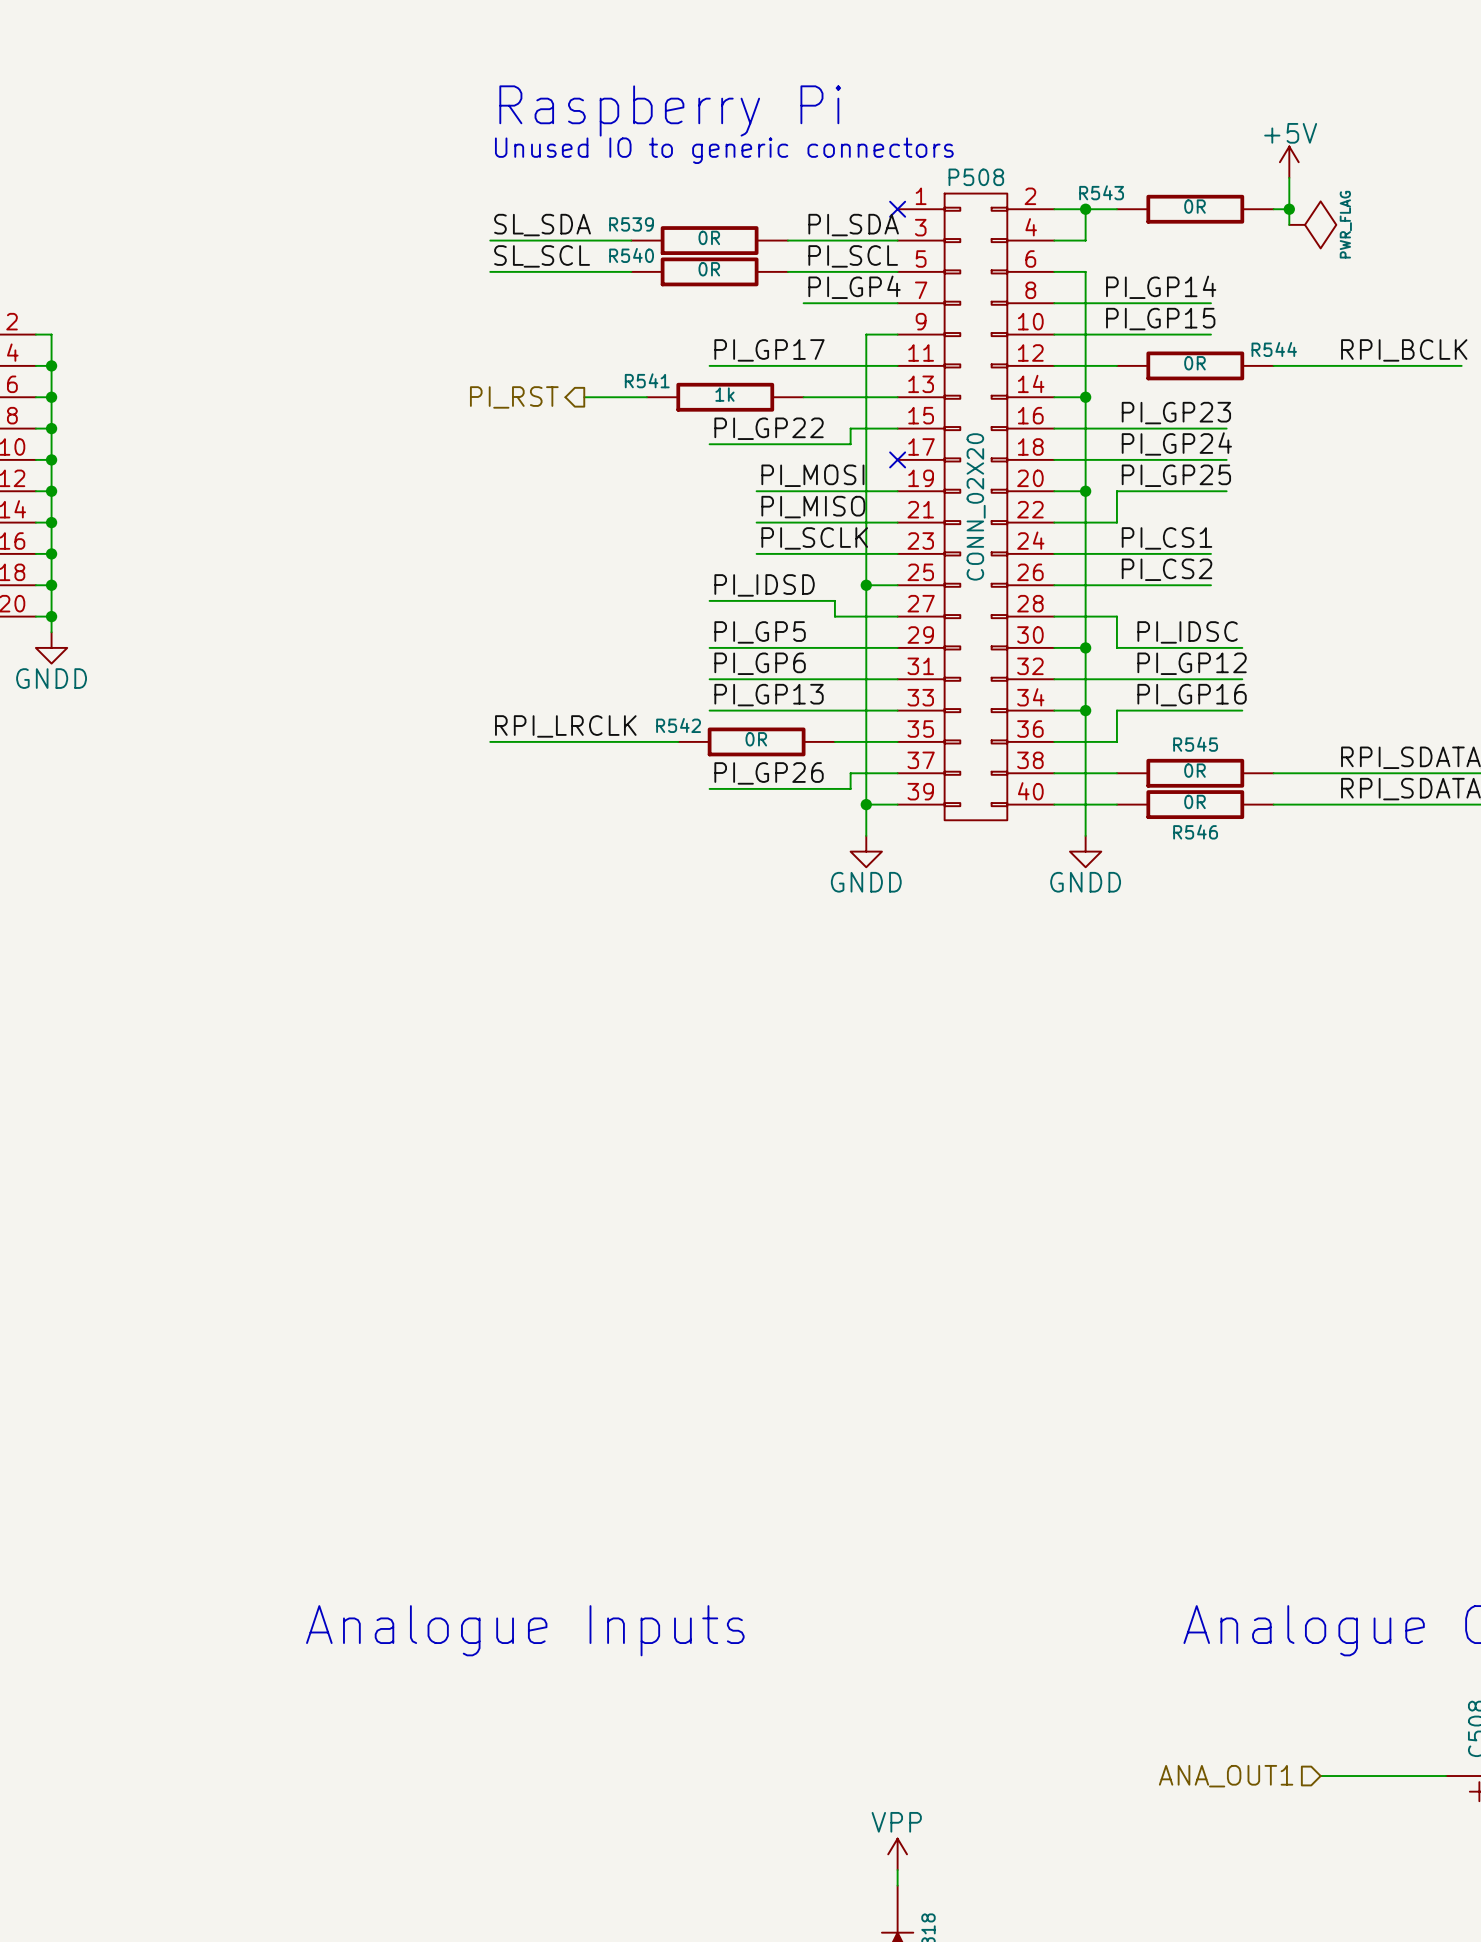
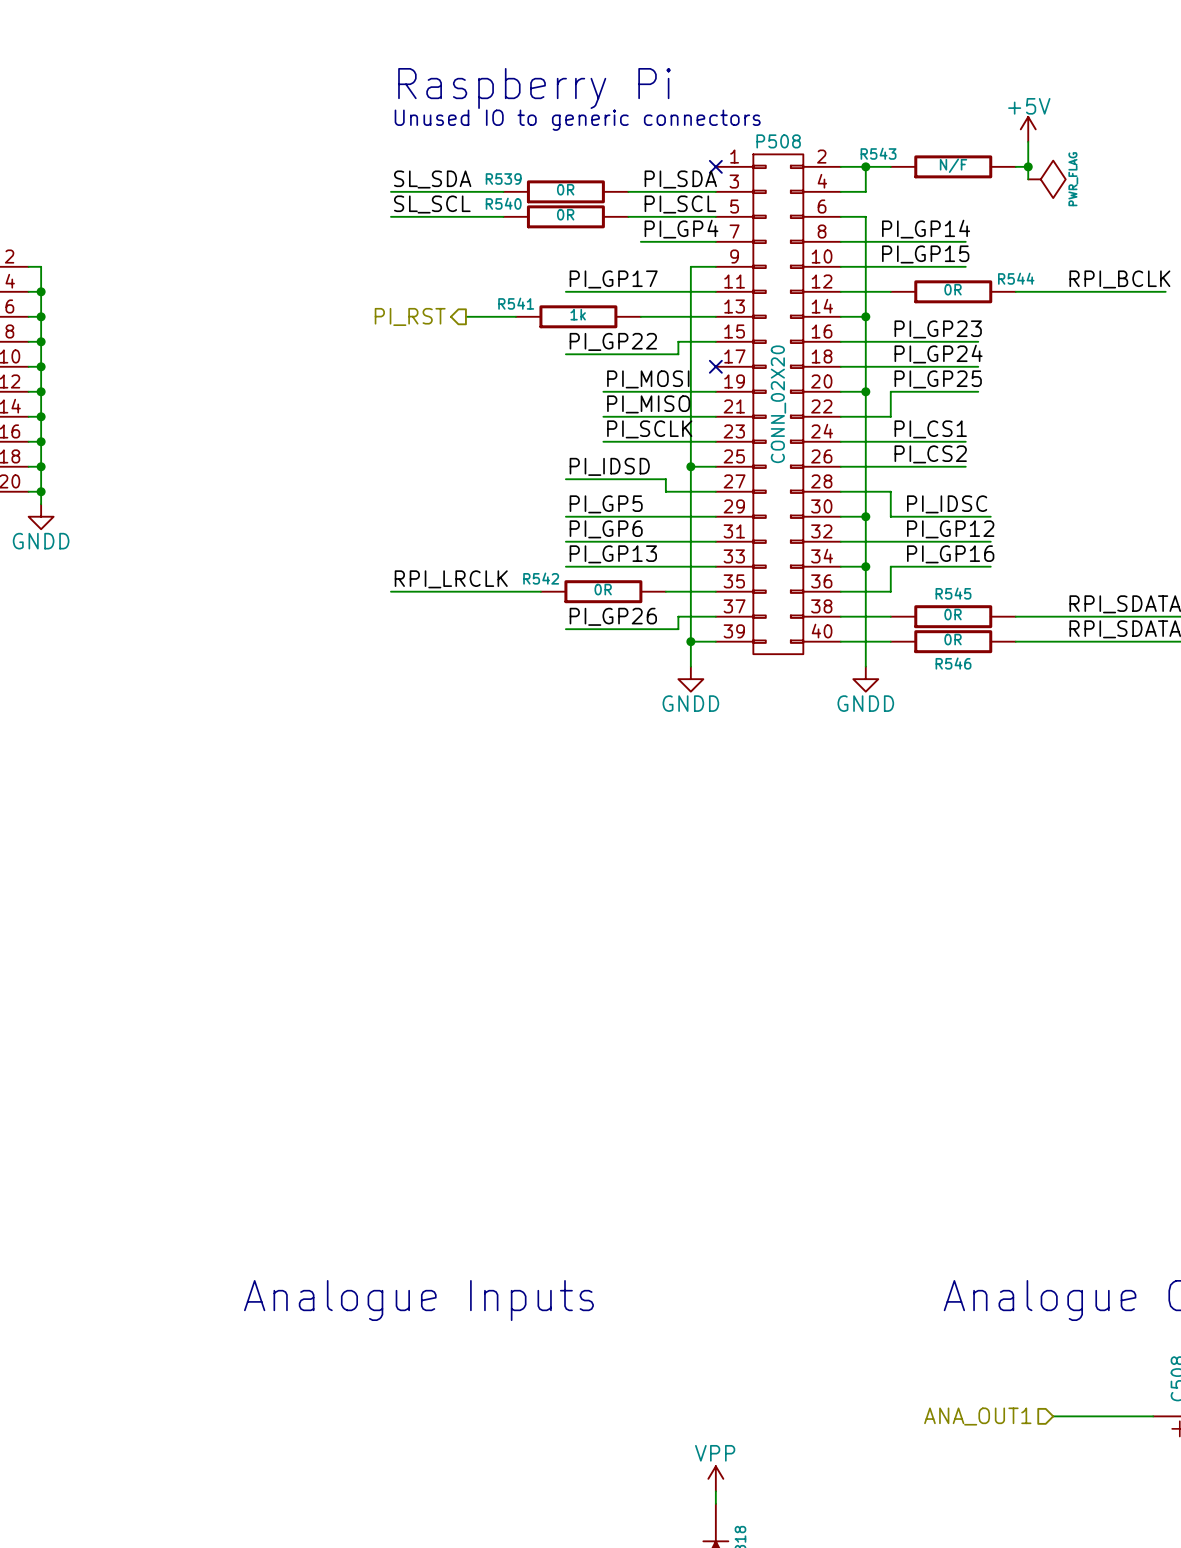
R543 value: 0R (1194, 206) -> N/F (953, 165)

